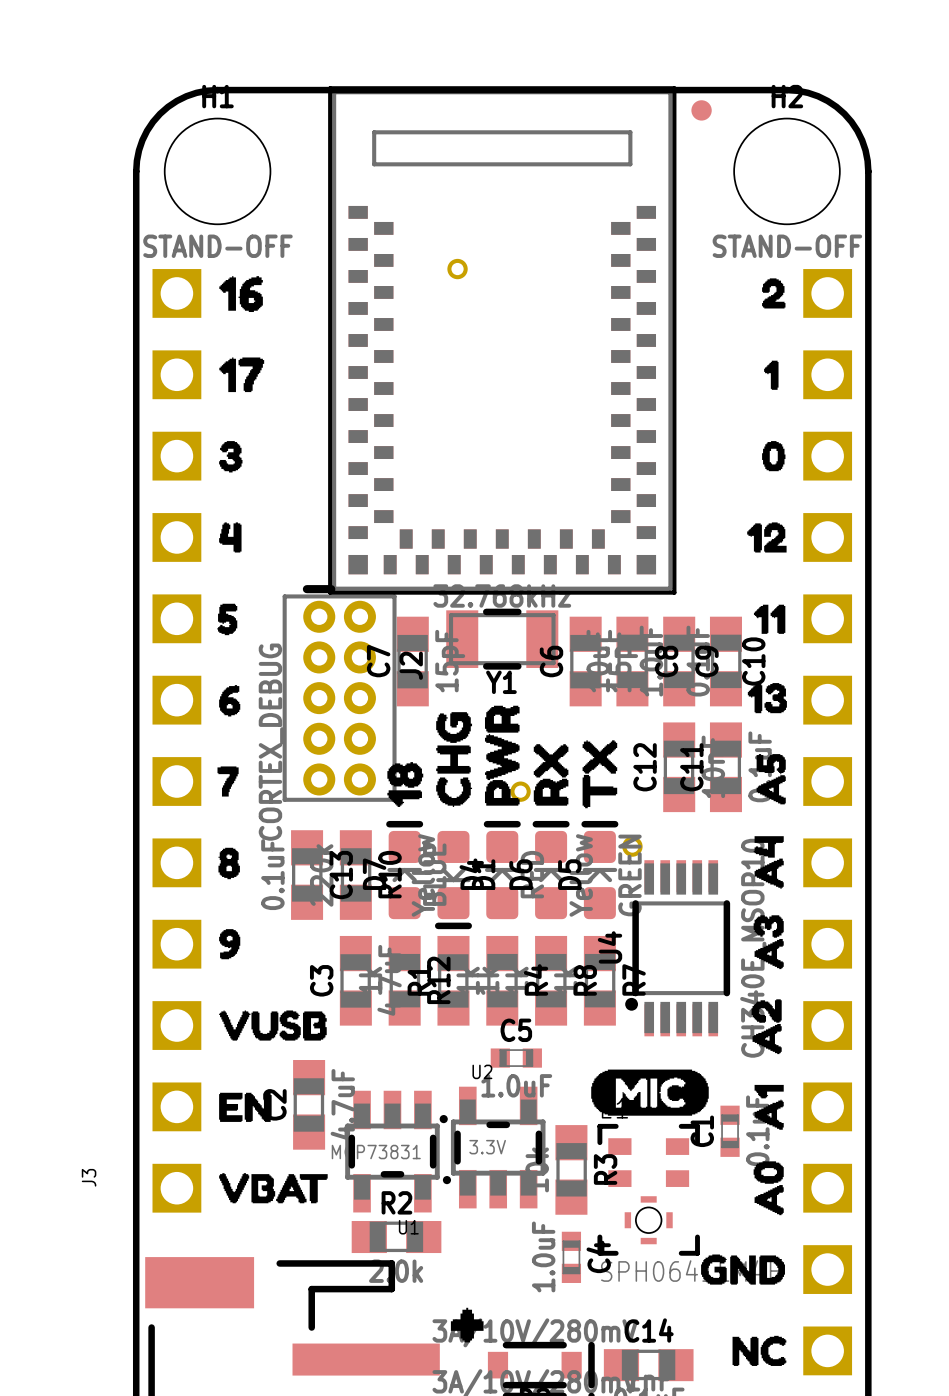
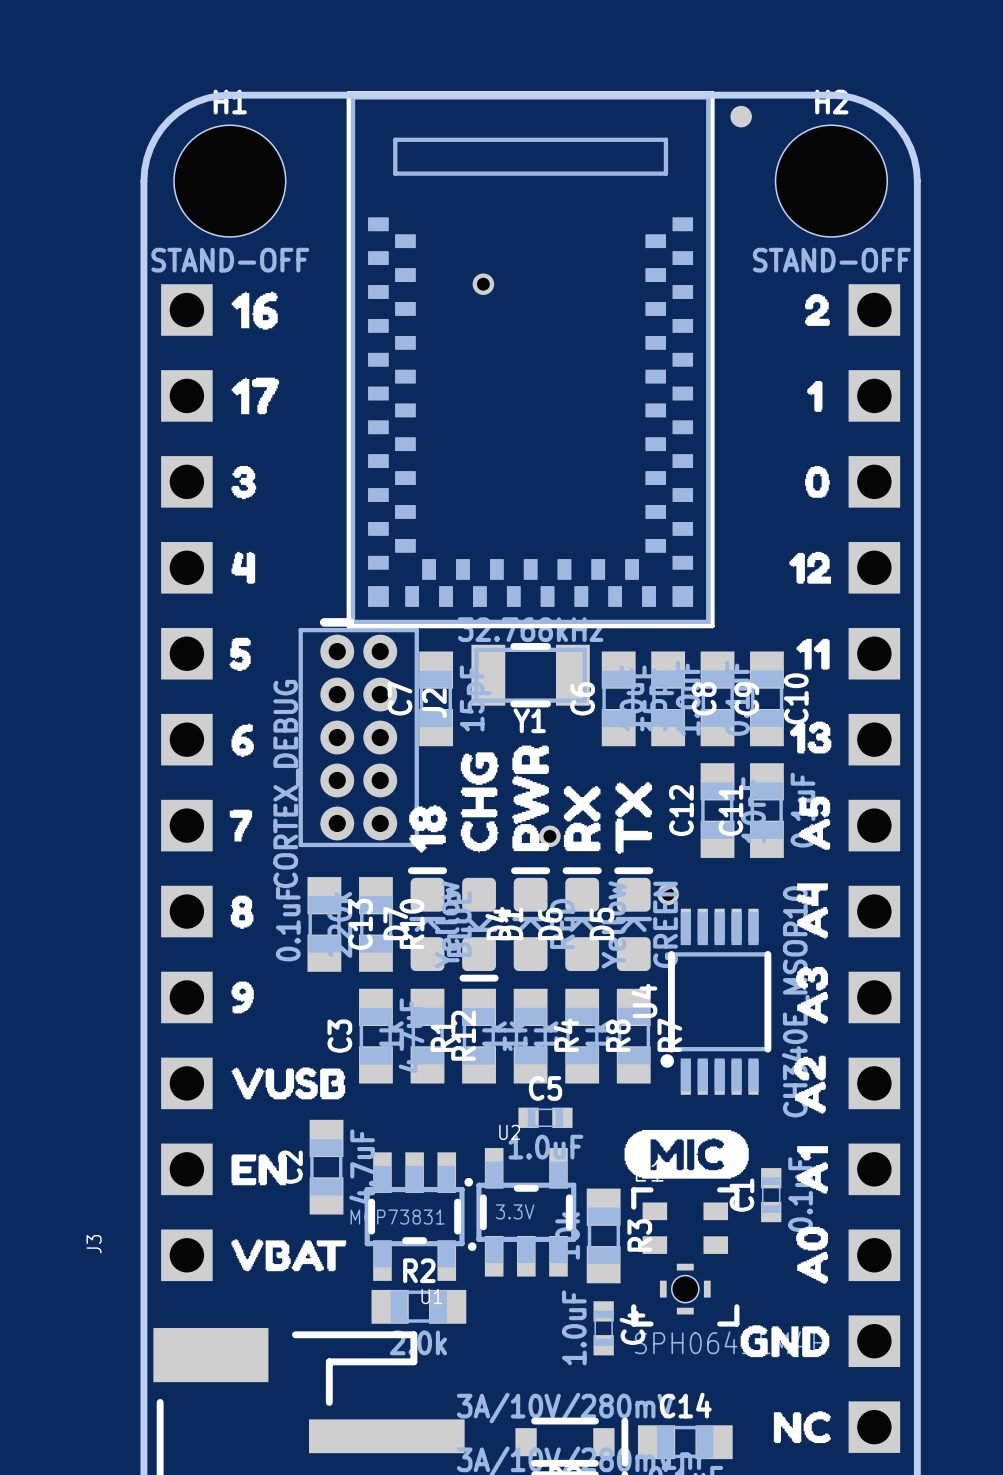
drawing: [450, 1307, 484, 1343] -> none

